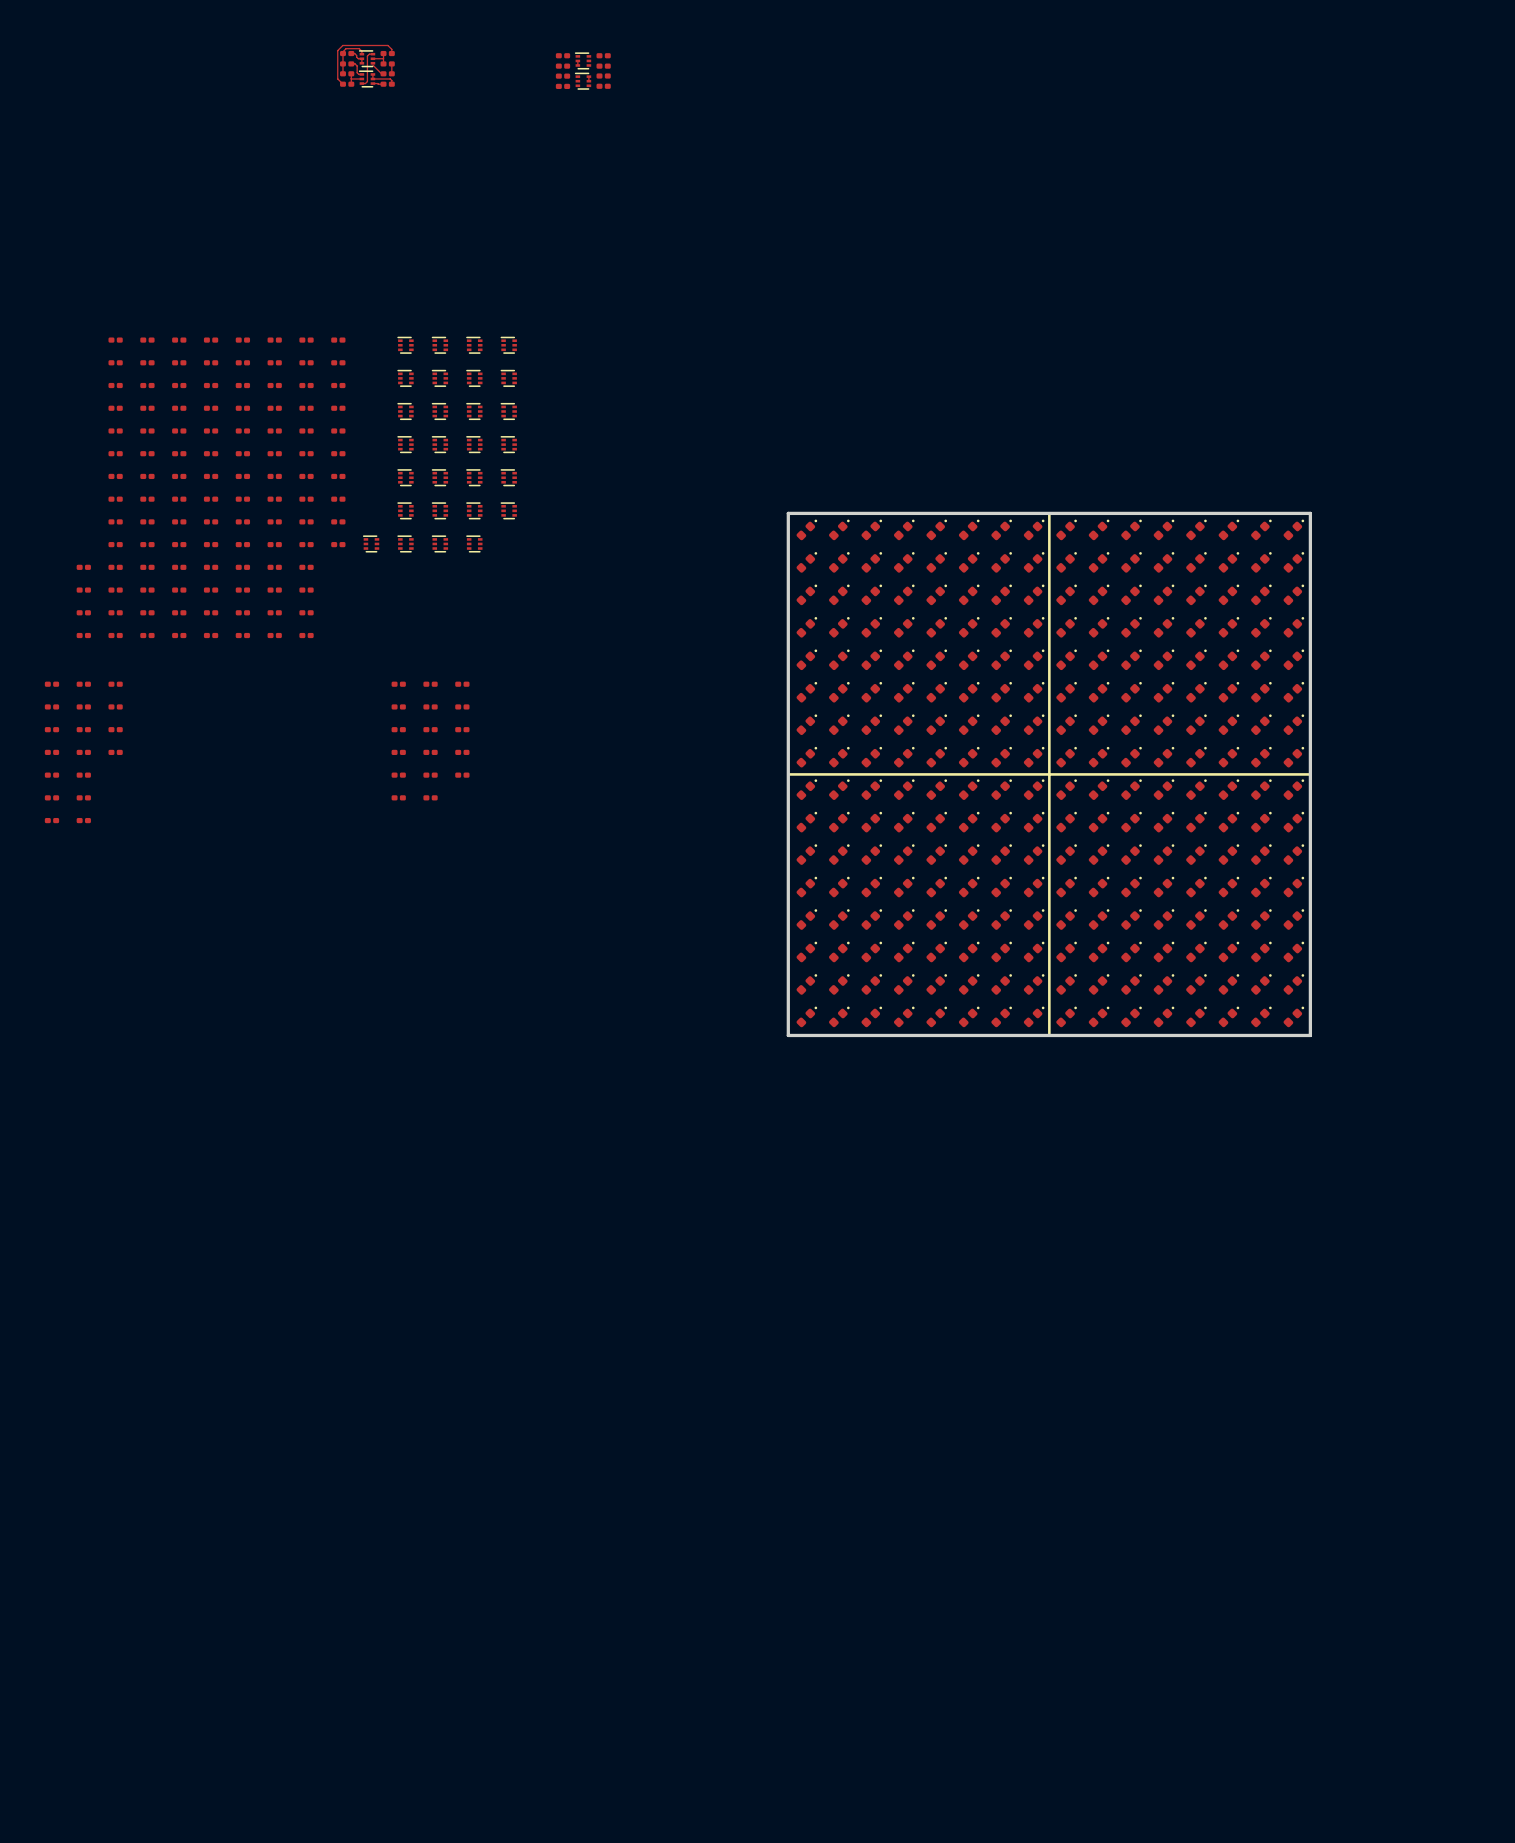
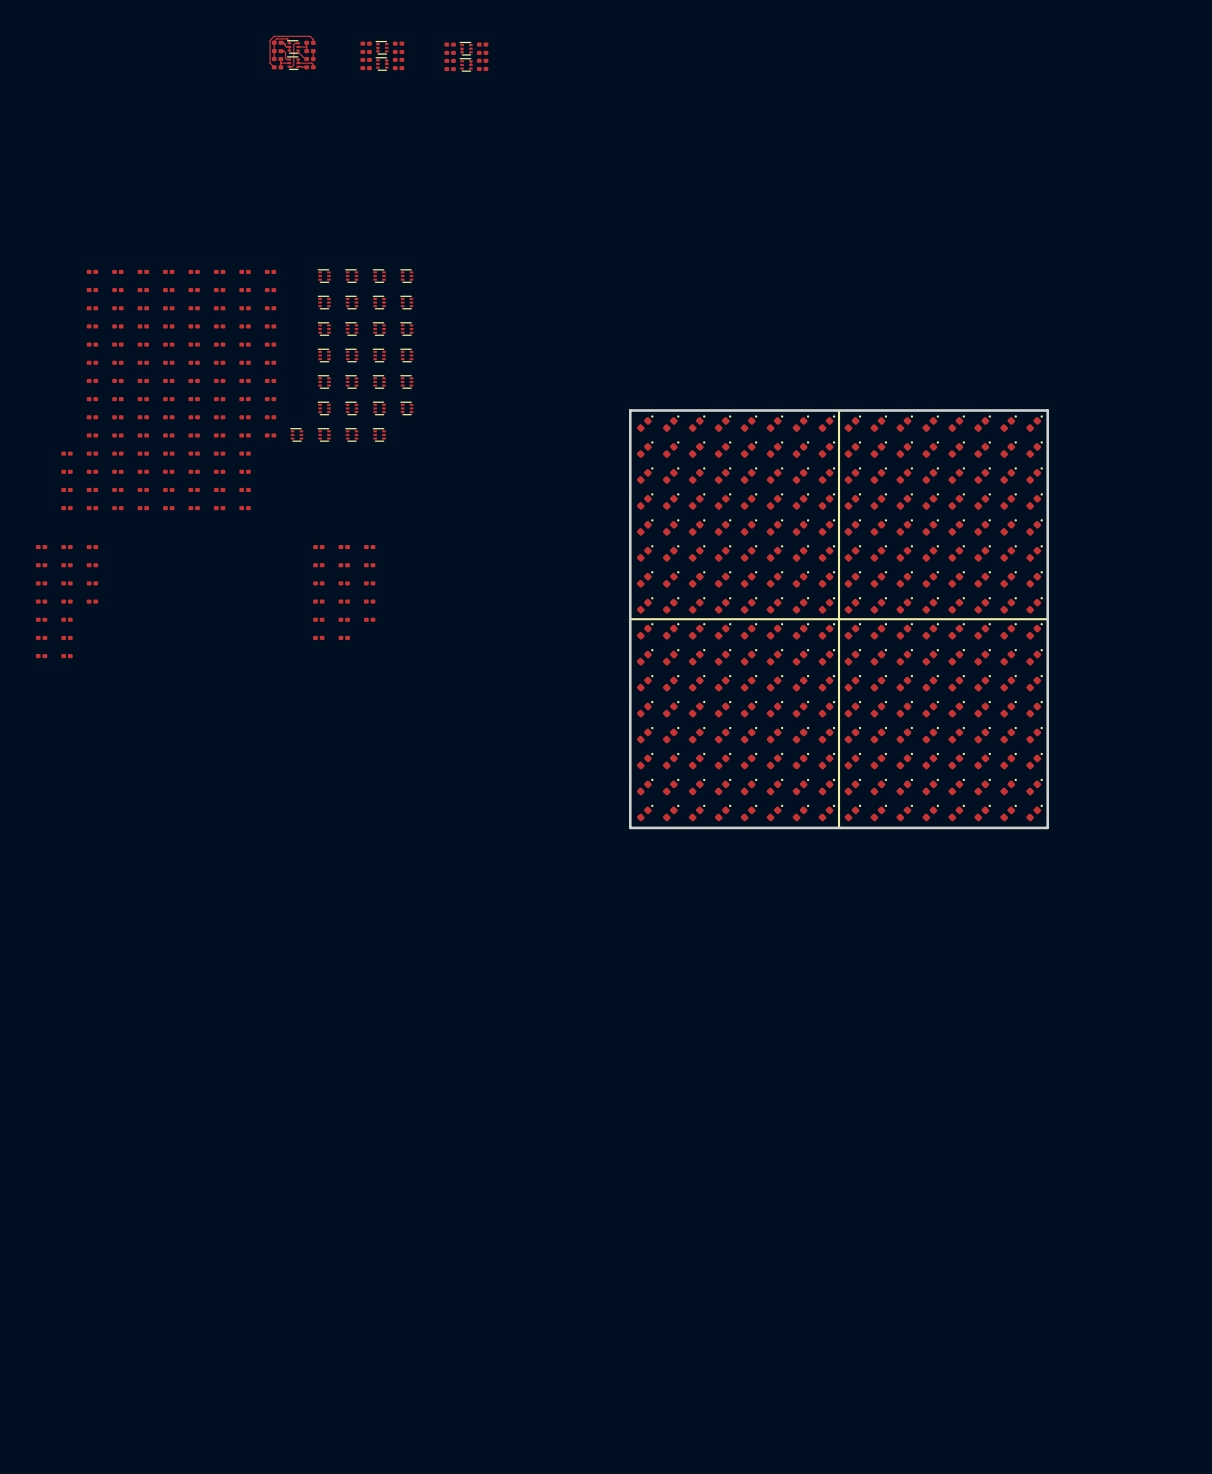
part: none -> (366, 43)
part: none -> (398, 43)
track: none -> (377, 47) (377, 51)
part: none -> (382, 47)
part: none -> (366, 51)
part: none -> (398, 51)
part: none -> (366, 59)
part: none -> (398, 59)
track: none -> (386, 60) (386, 63)
part: none -> (382, 63)
part: none -> (366, 68)
part: none -> (398, 68)

